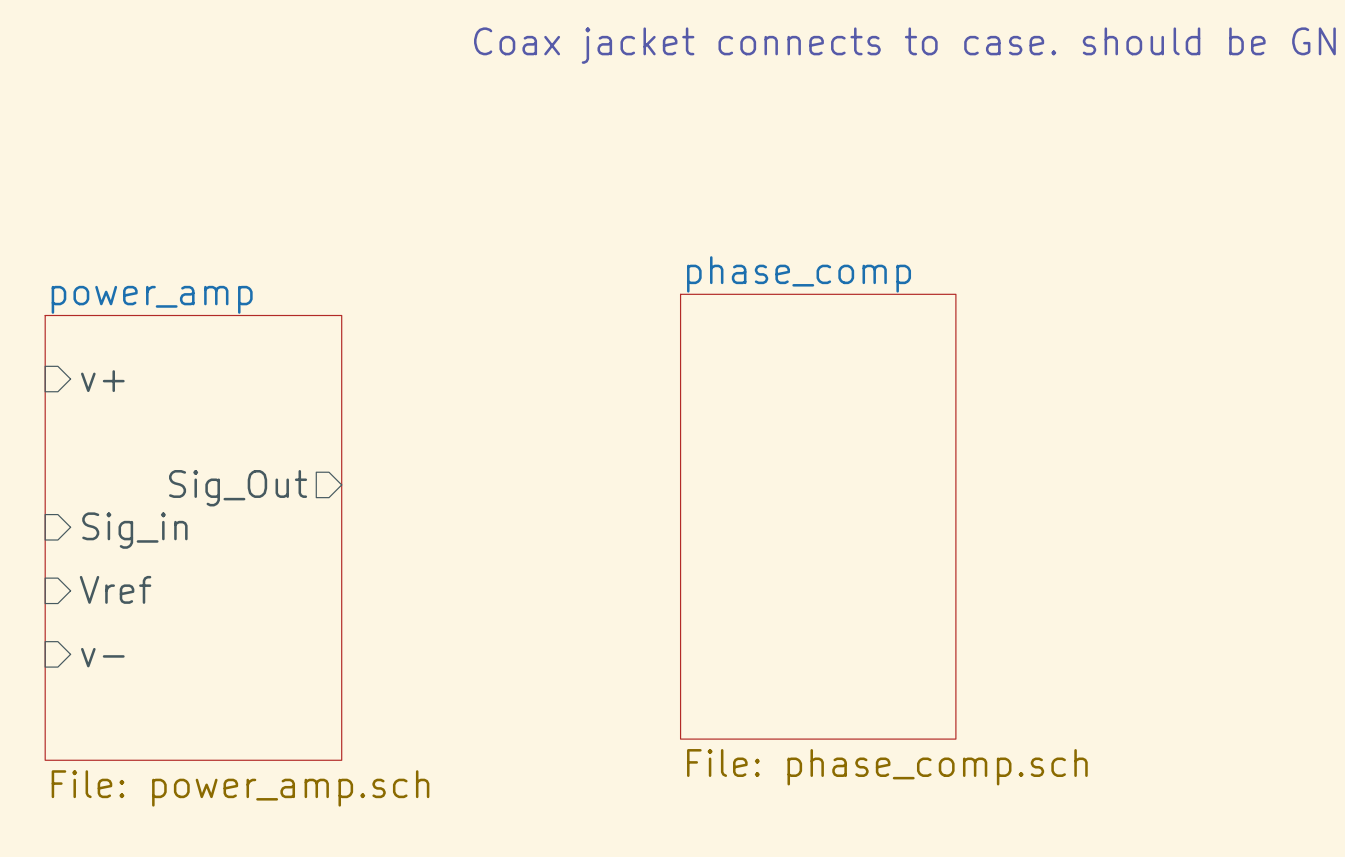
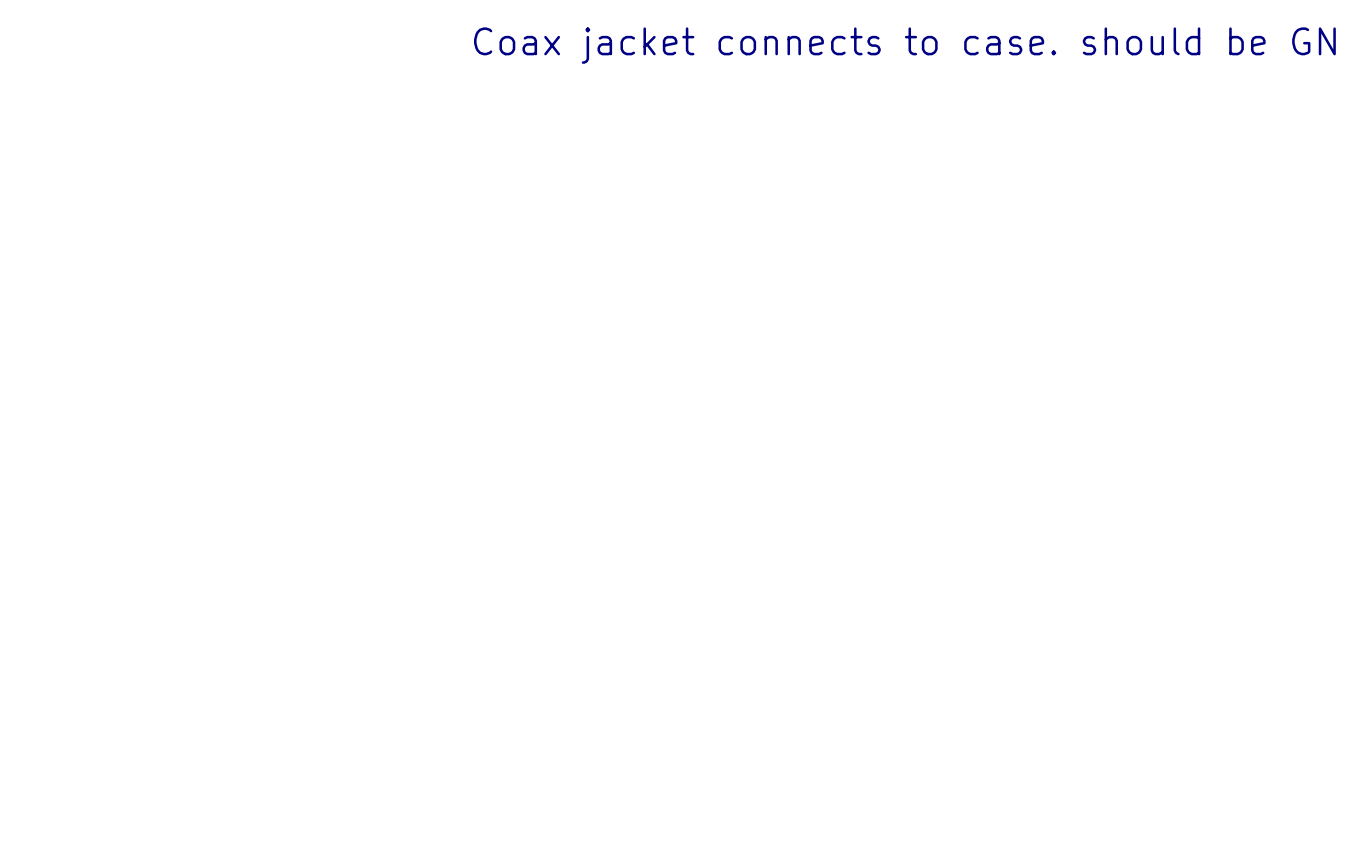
sheet pin: v+ (102, 381) -> none
sheet pin: Sig_Out (238, 488) -> none
sheet phase_comp: File: phase_comp.sch (818, 516) -> none
sheet pin: Sig_in (134, 530) -> none
sheet power_amp: File: power_amp.sch (193, 537) -> none
sheet pin: Vref (115, 589) -> none
sheet pin: v- (102, 657) -> none

